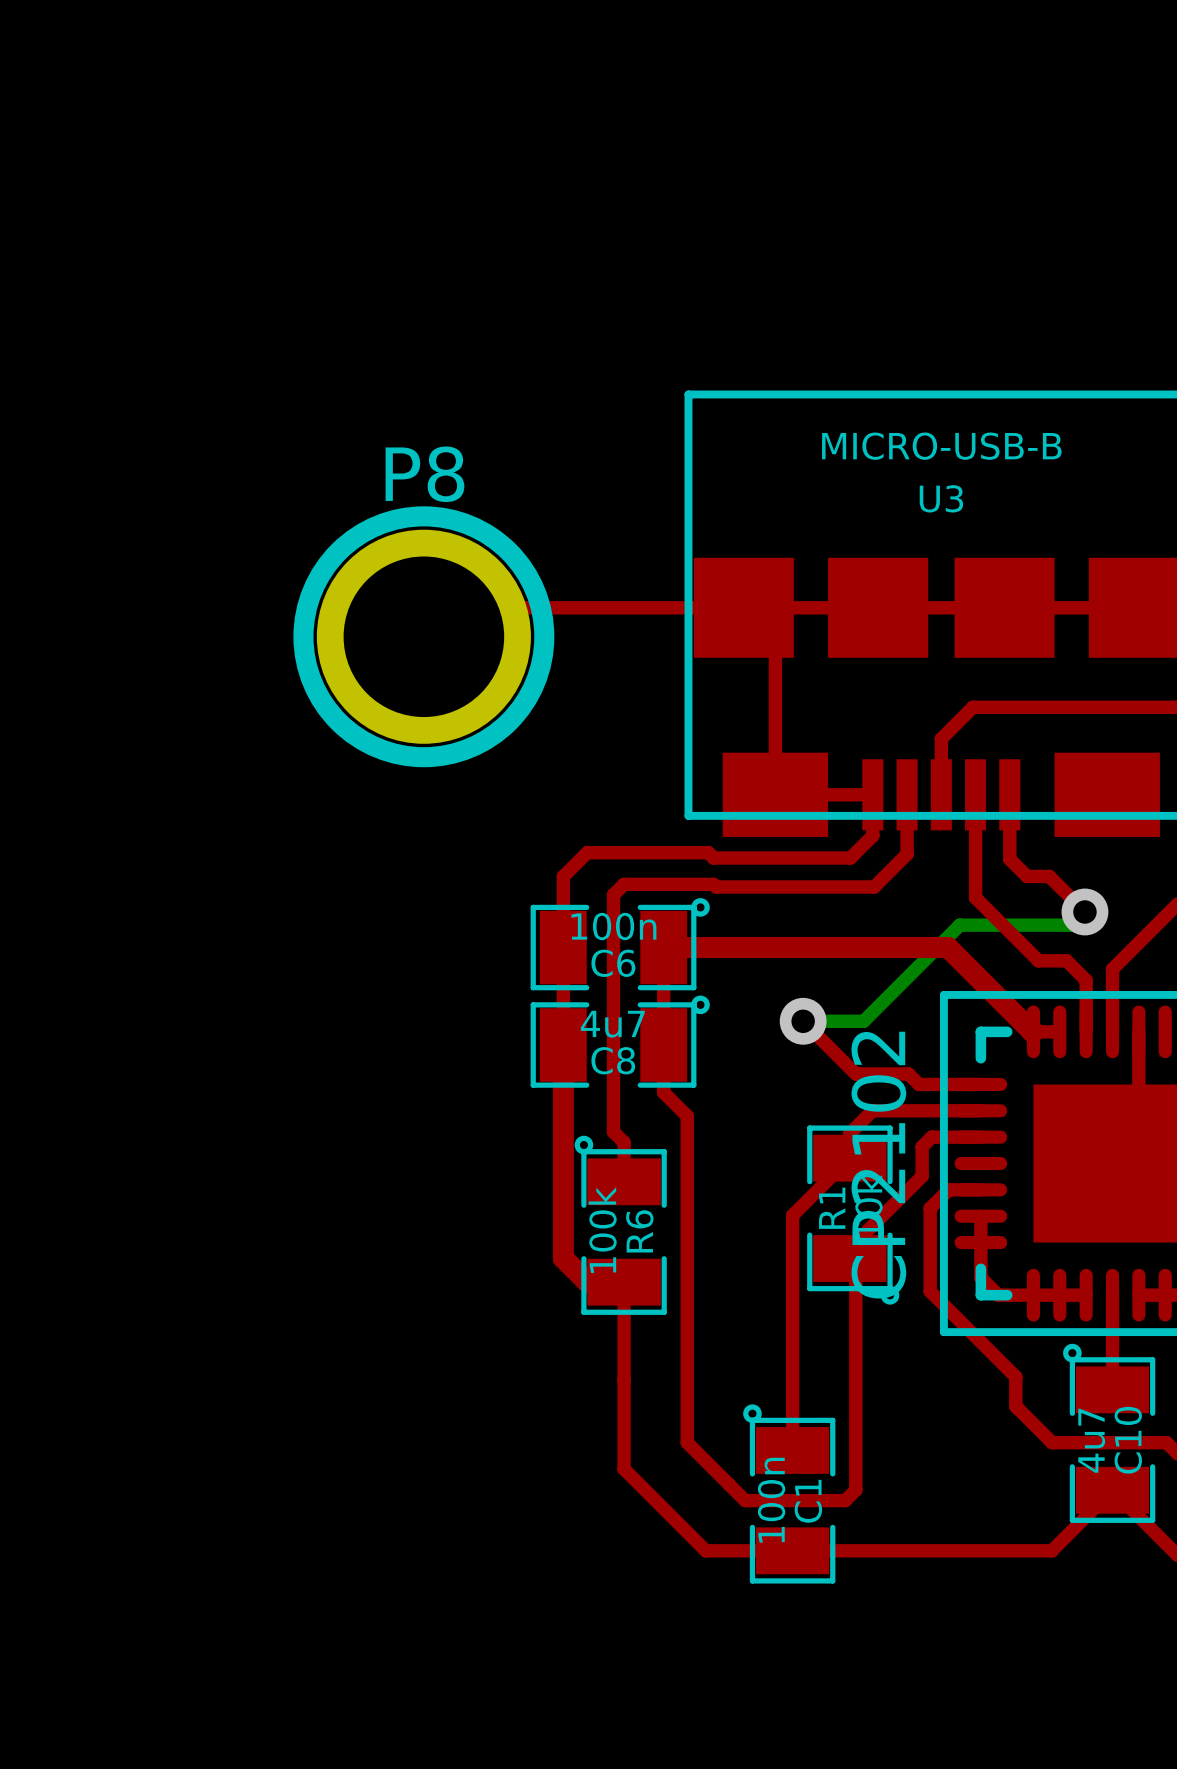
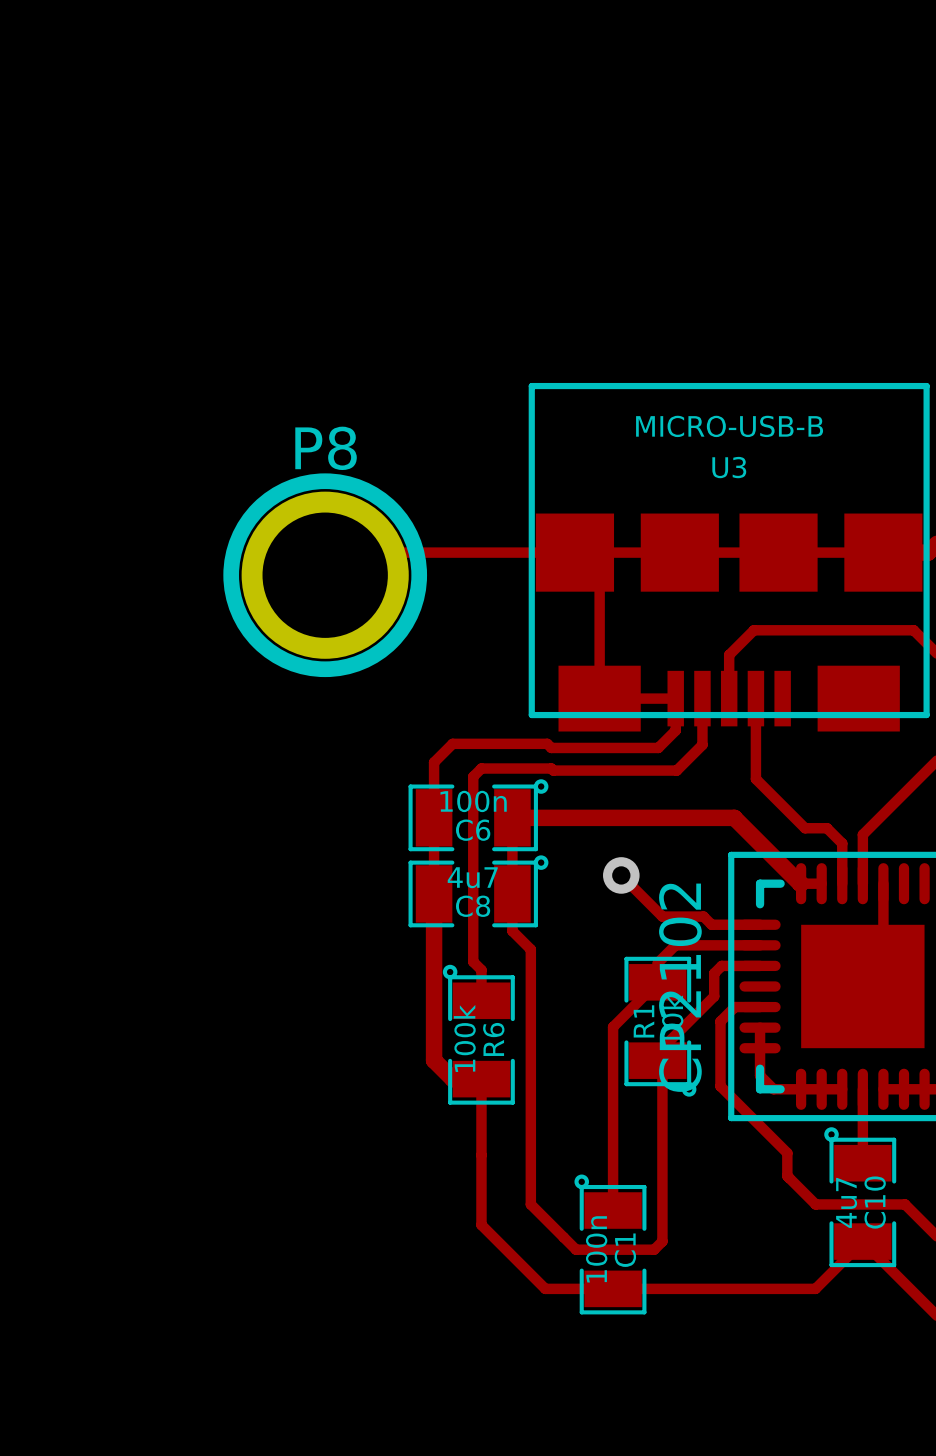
top track: (1009, 794) (1009, 859) (1027, 876) (1049, 876) (1084, 911) -> none
bottom track: (1084, 911) (1071, 925) (959, 925) (863, 1021) (803, 1021) -> none
via: (1084, 911) -> none

